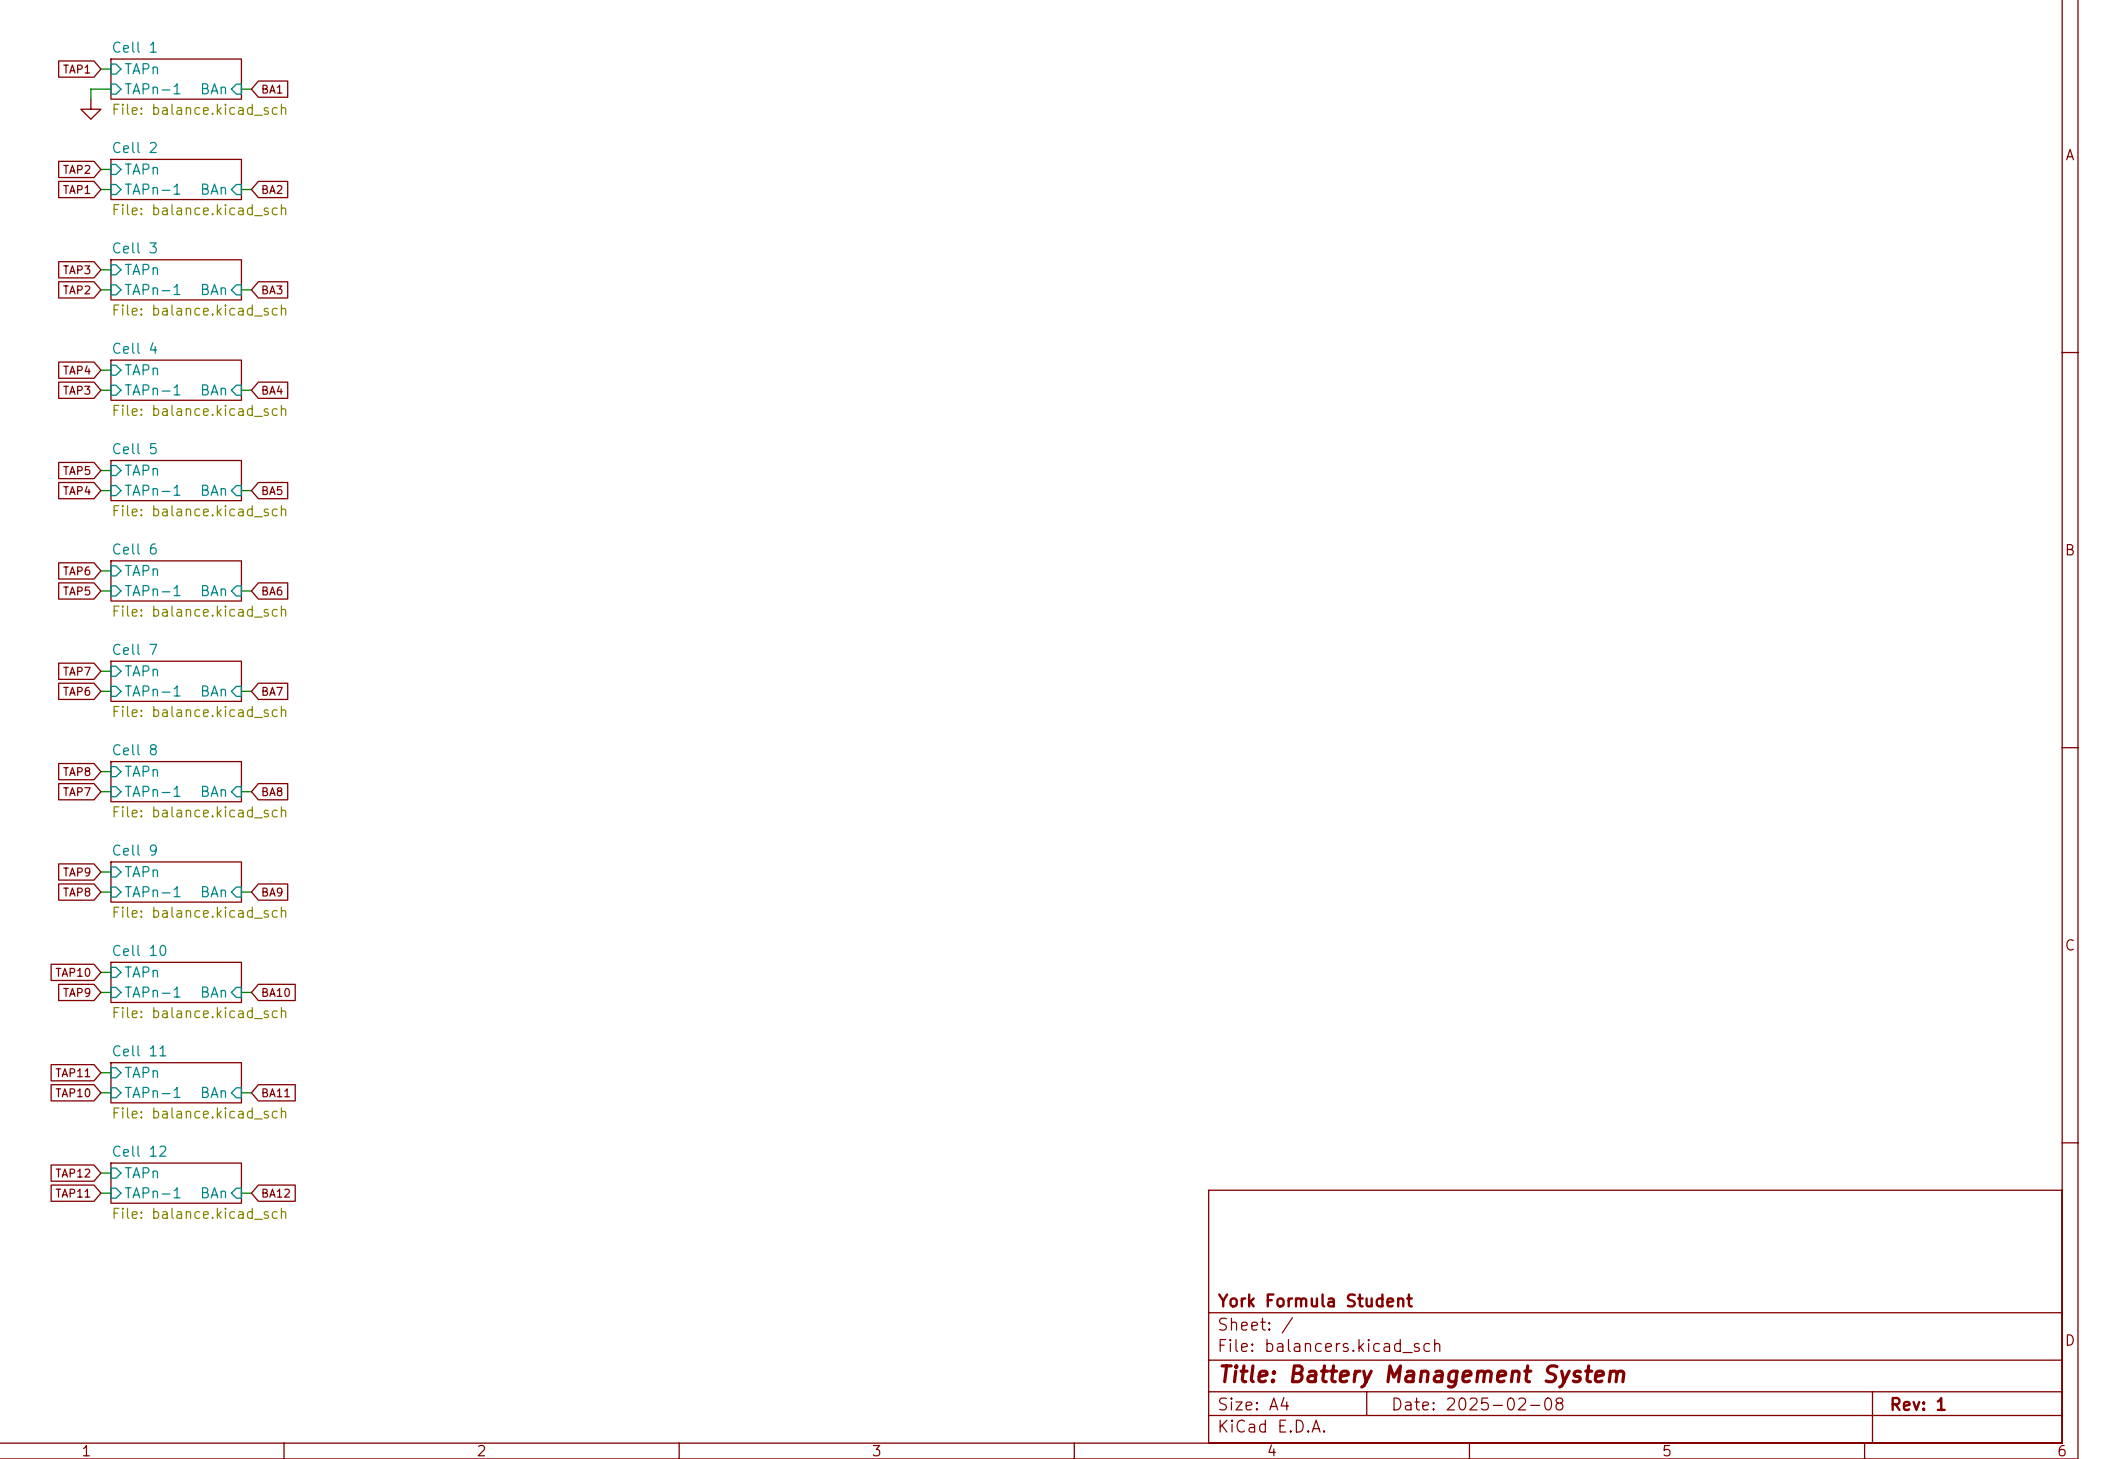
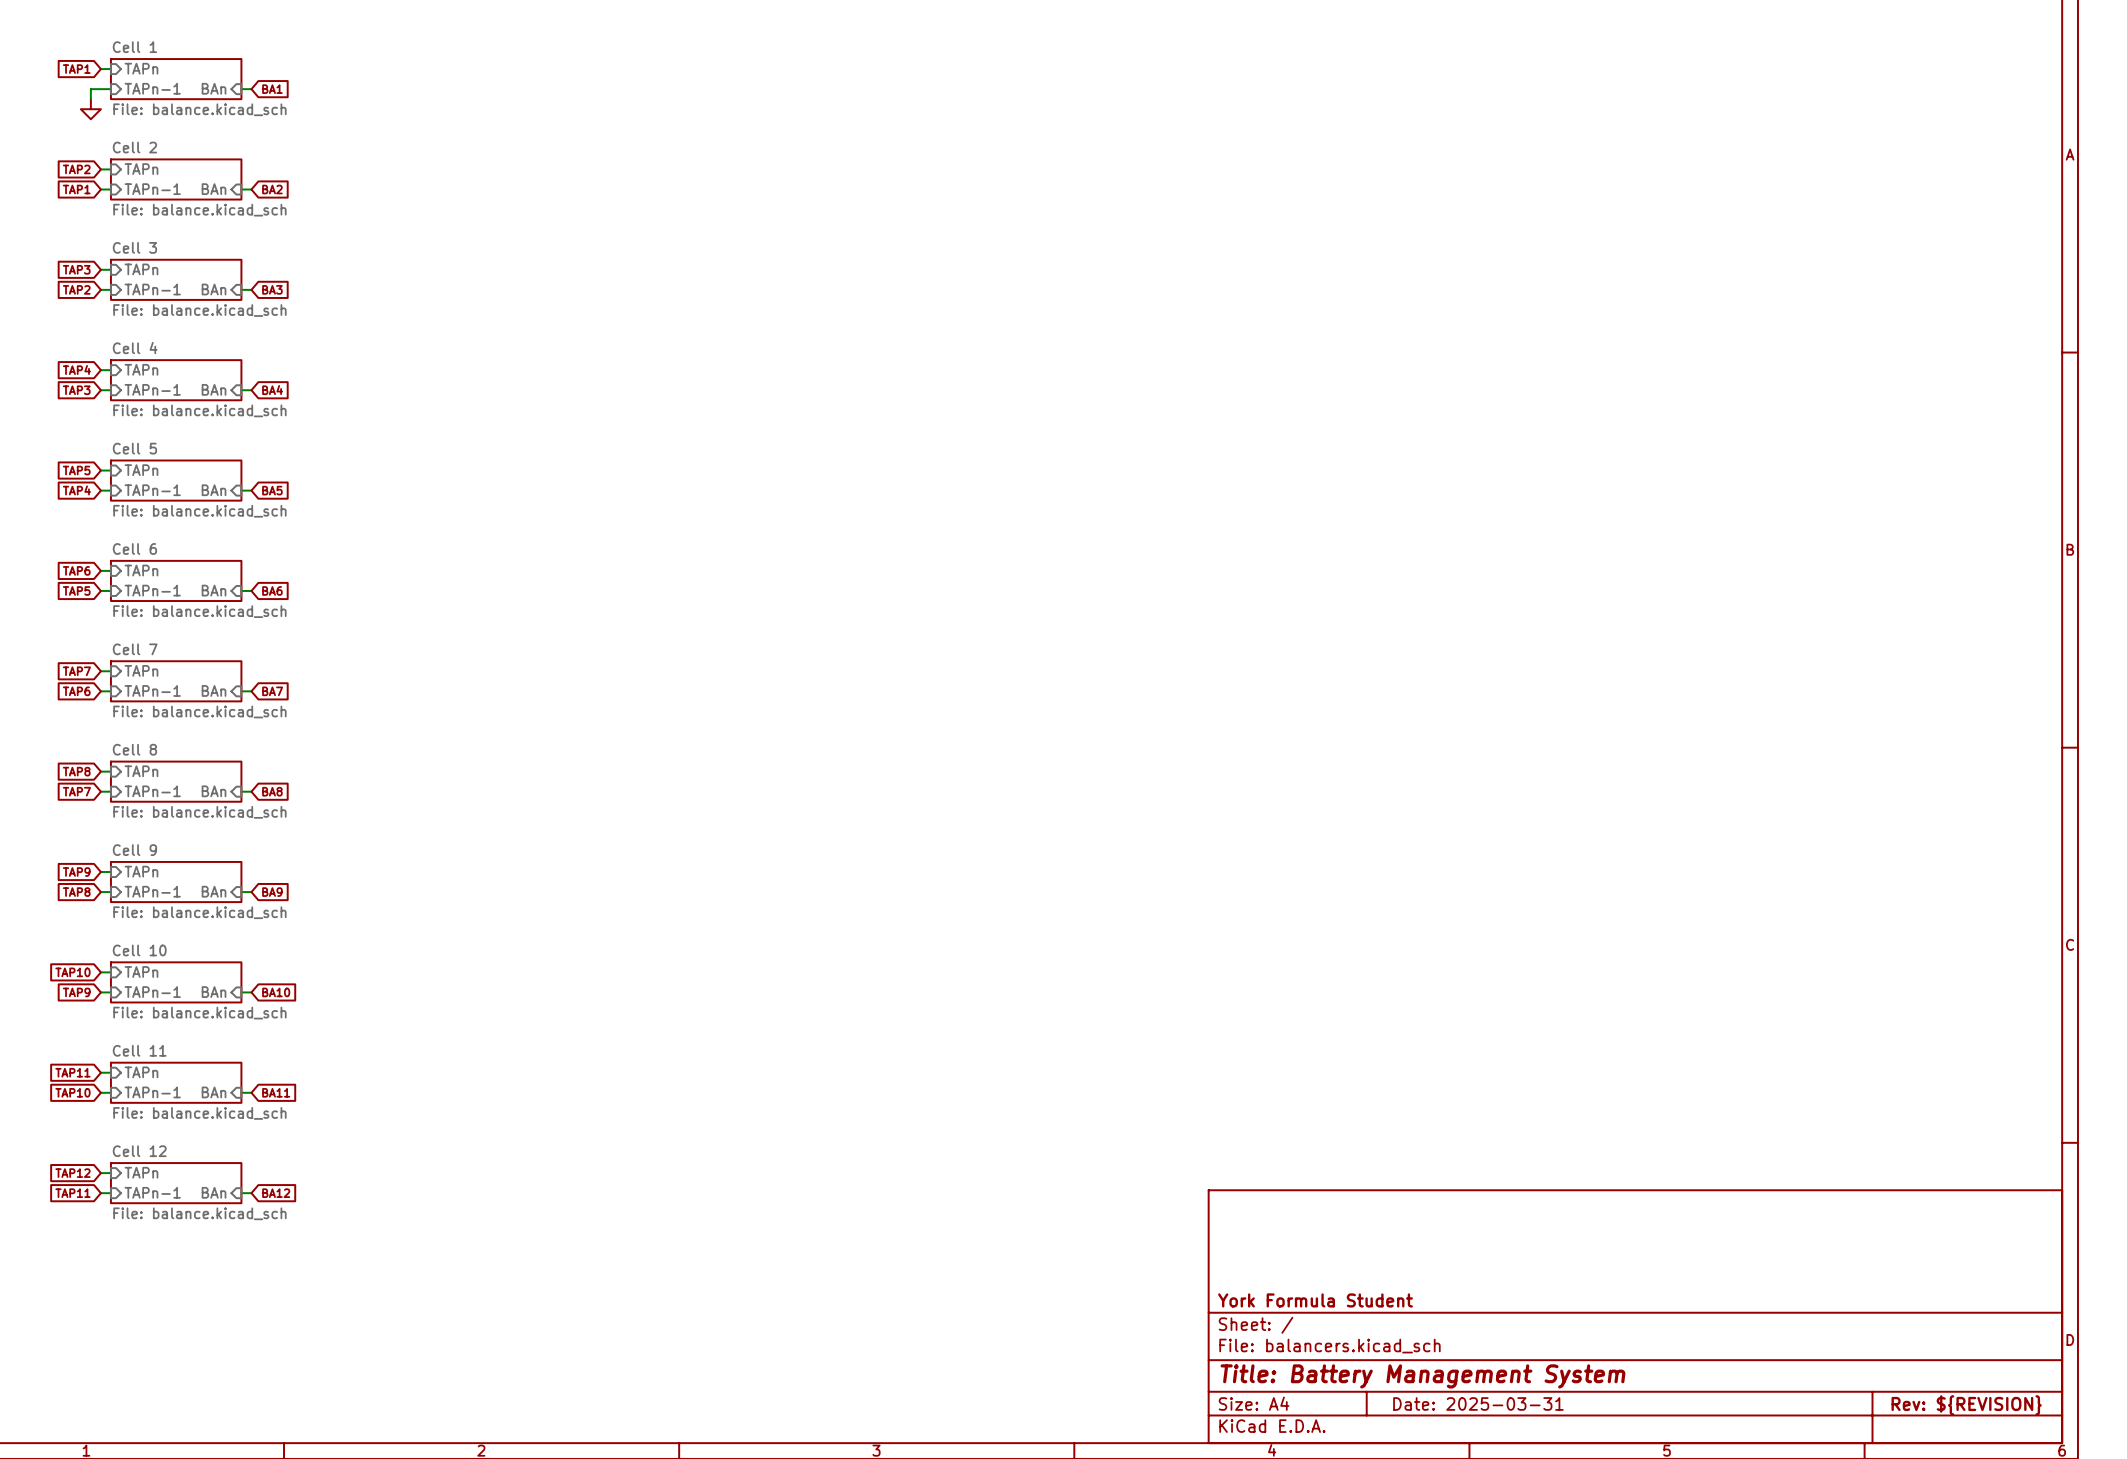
title block: Date: 2025-02-08 (1478, 1403) -> Date: 2025-03-31 (1478, 1403)
title block: Rev: 1 (1918, 1403) -> Rev: ${REVISION} (1966, 1405)

